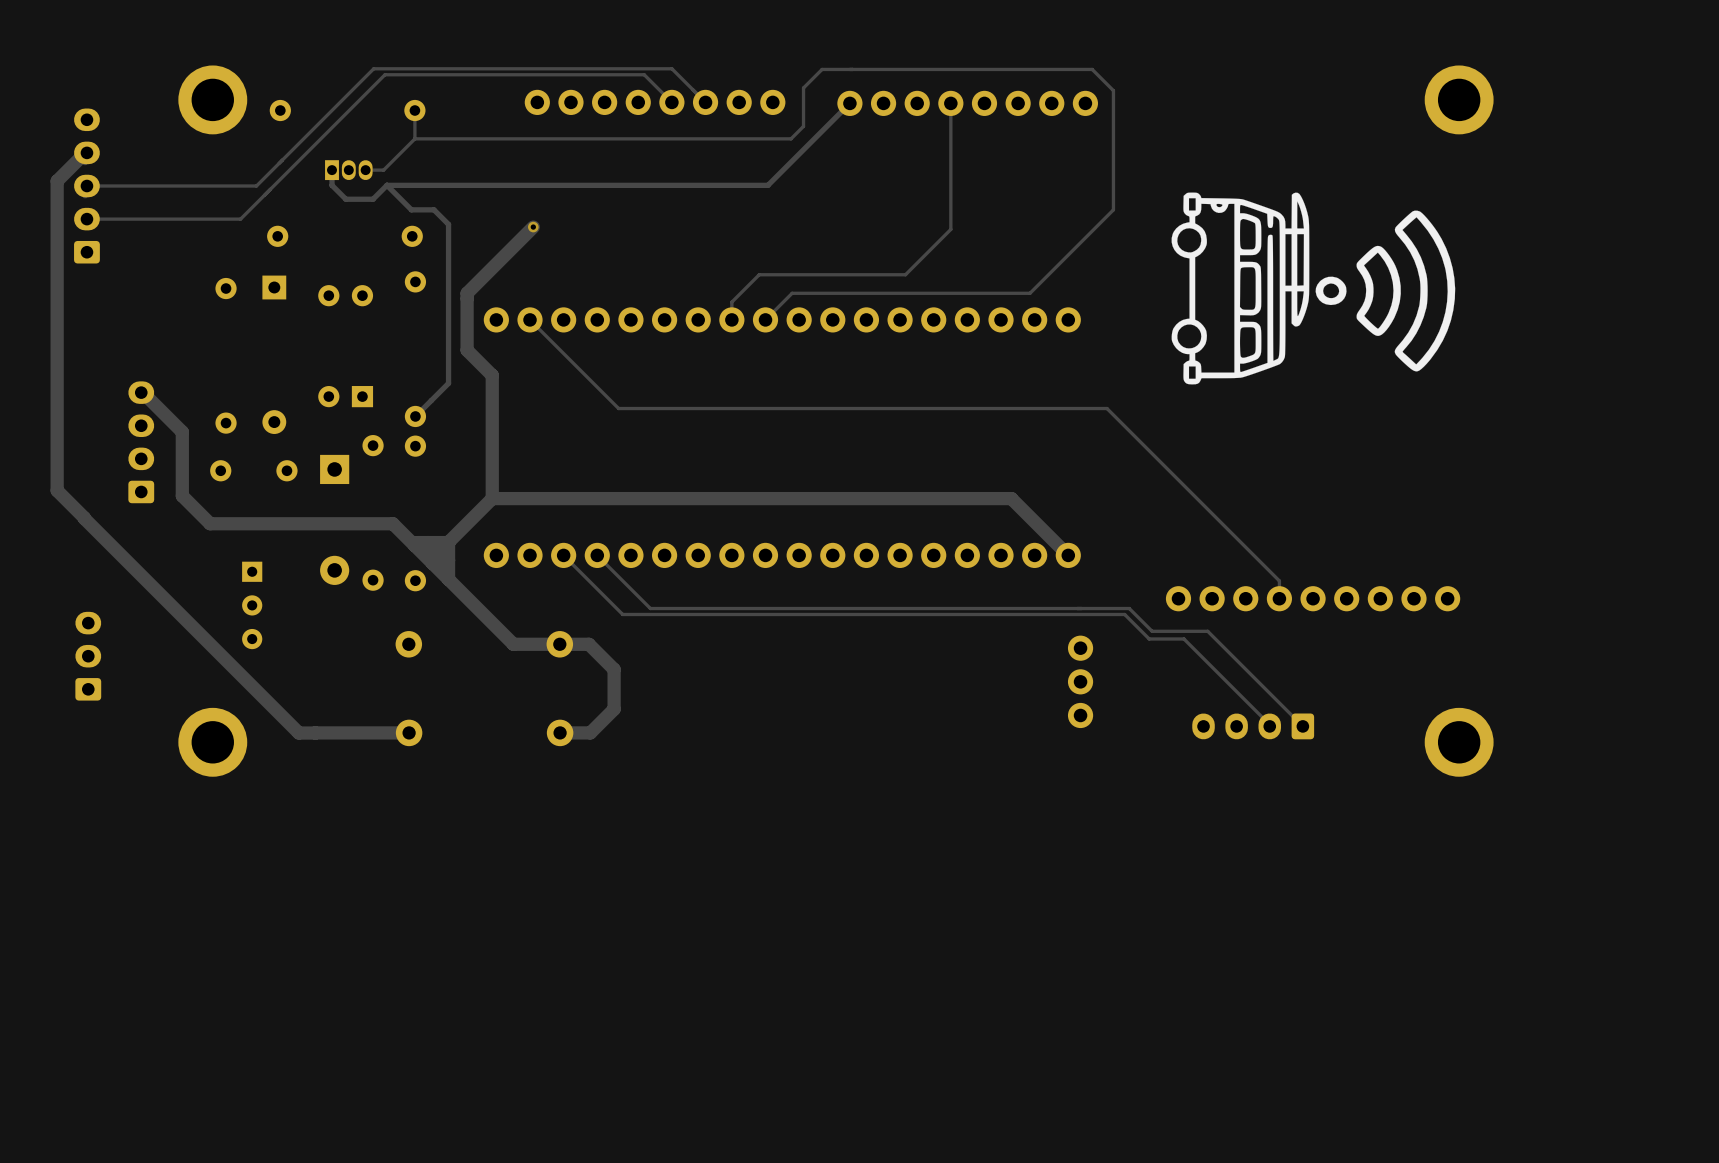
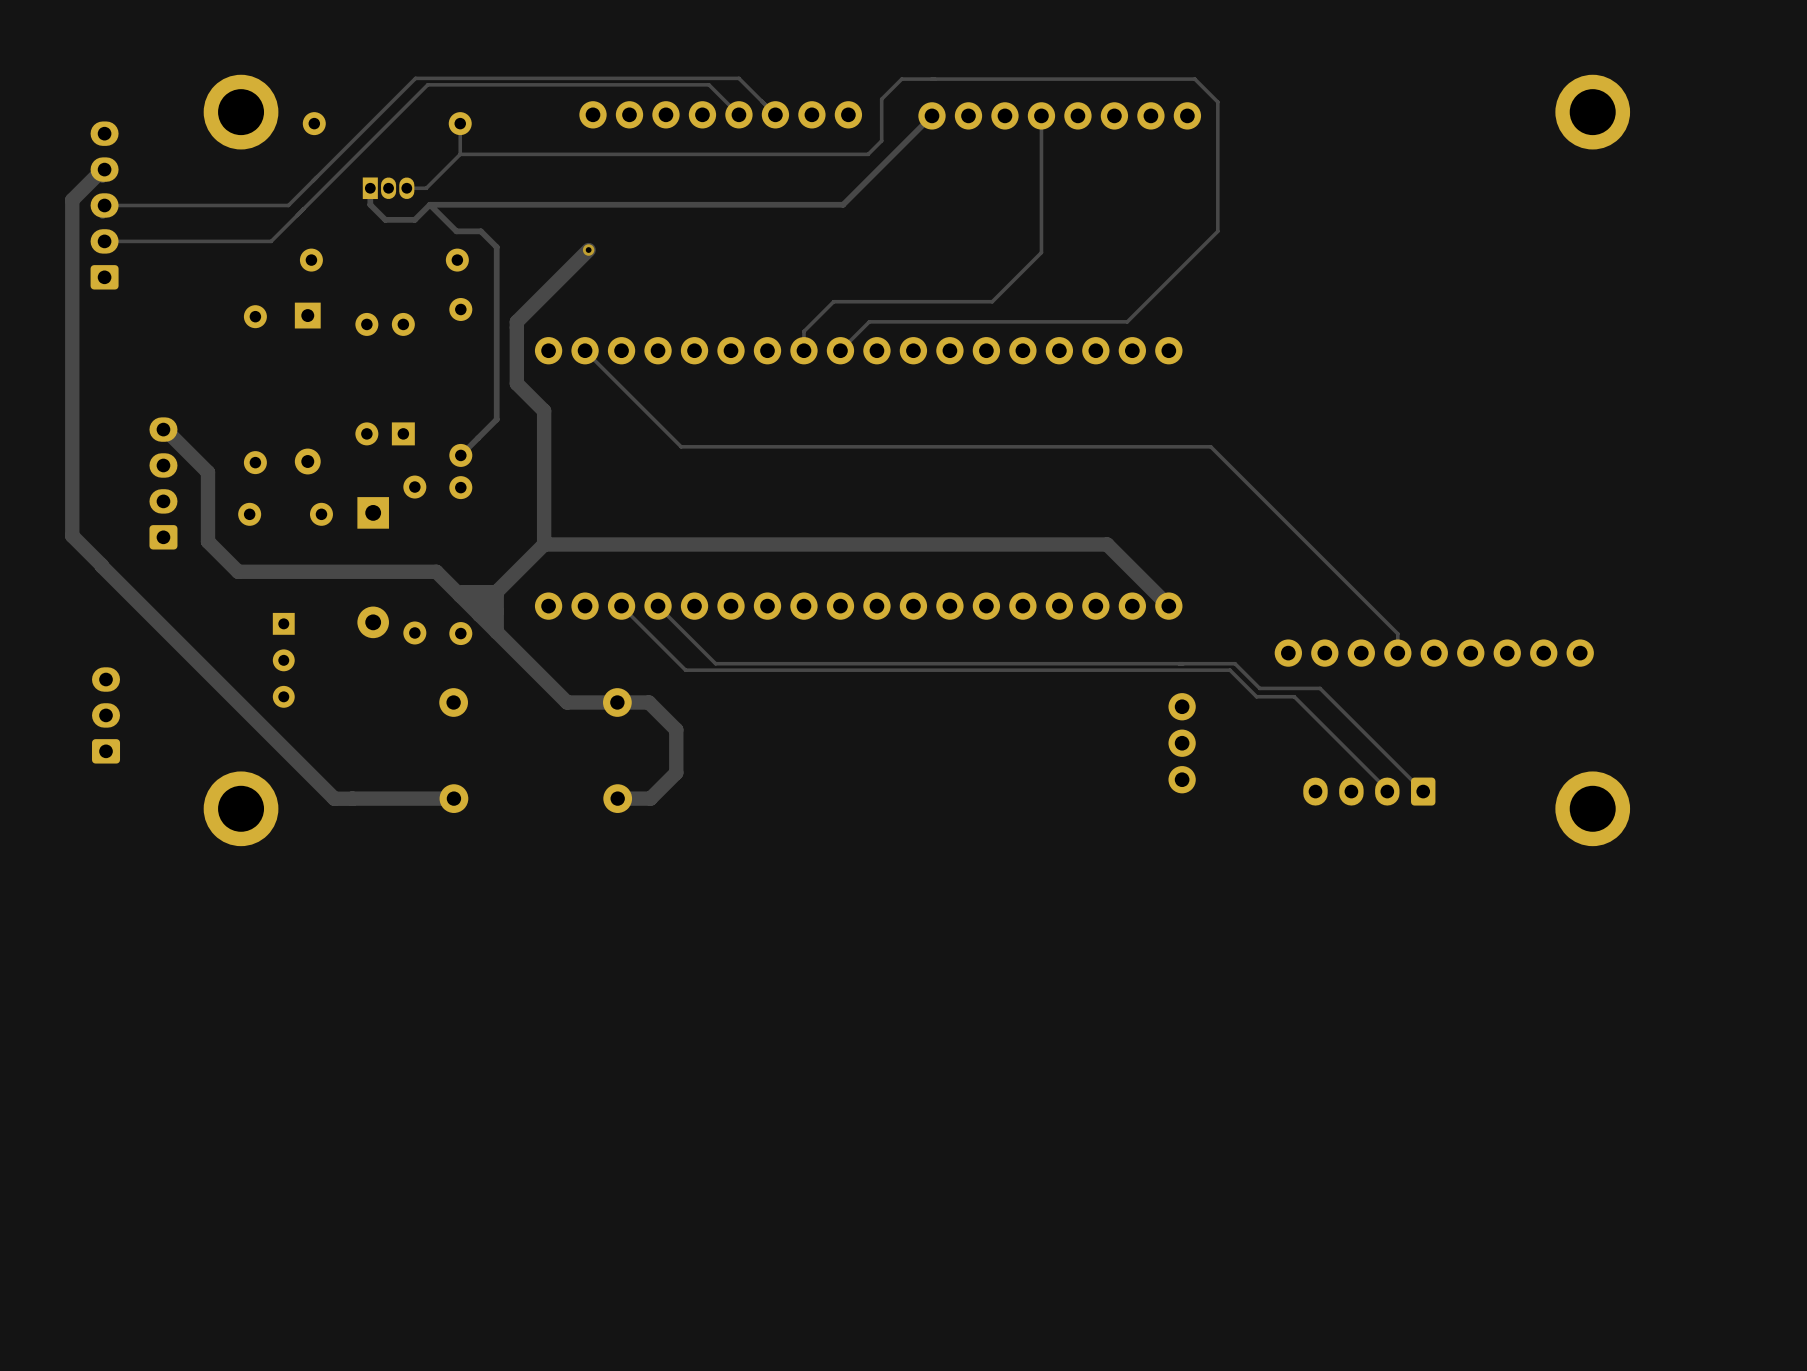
drawing: [1171, 192, 1456, 385] -> none

